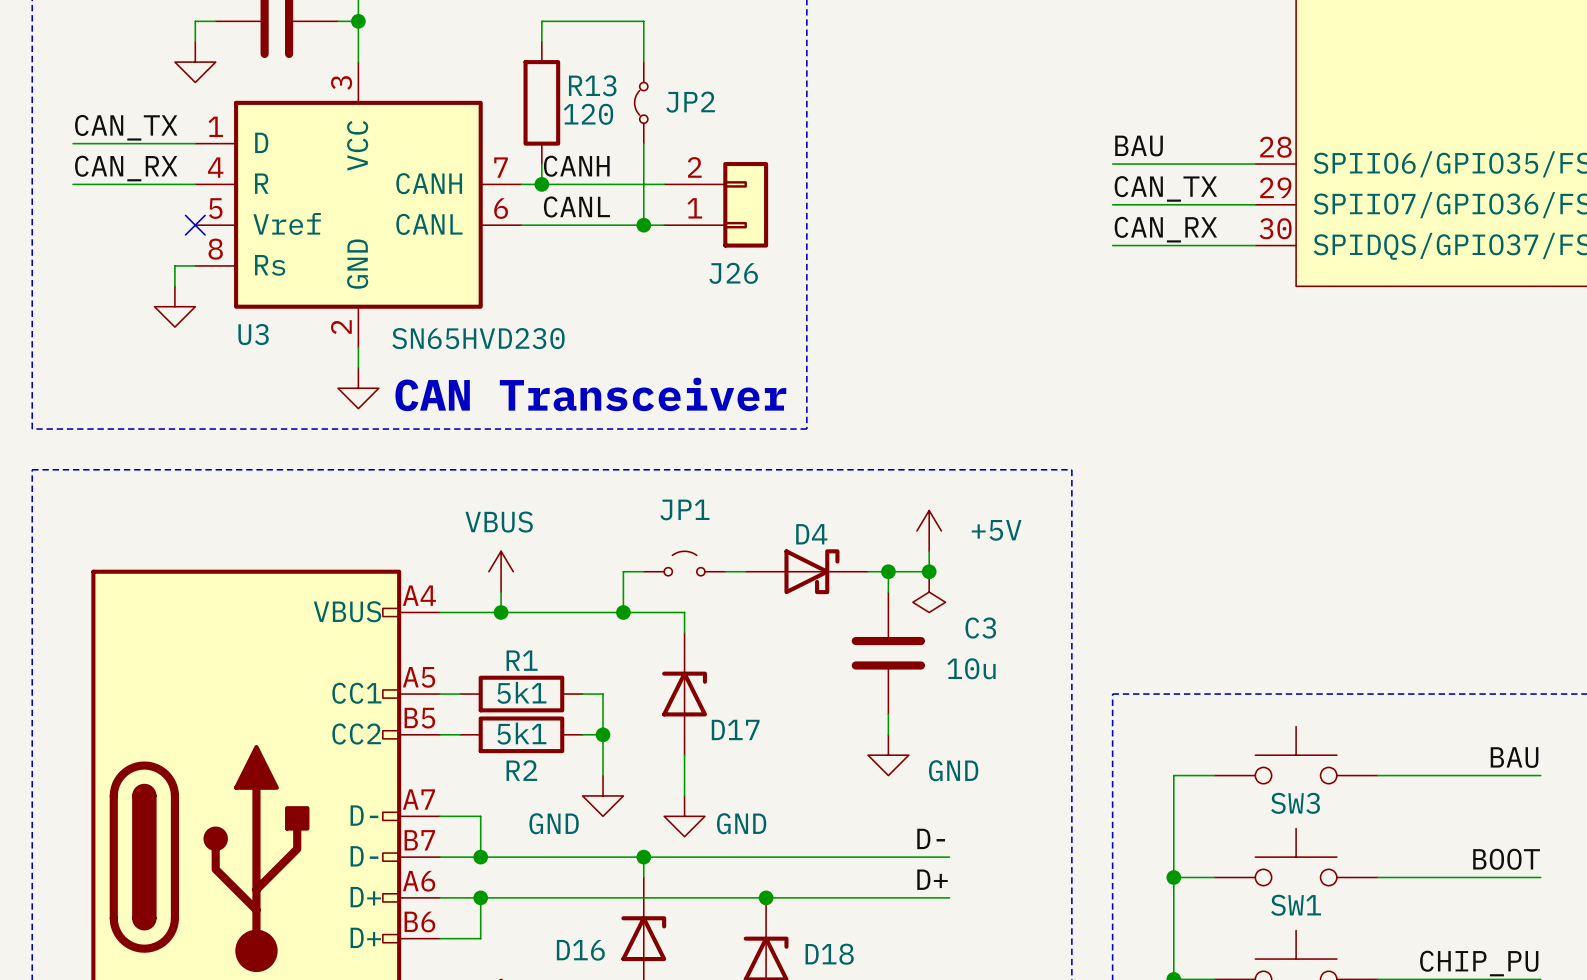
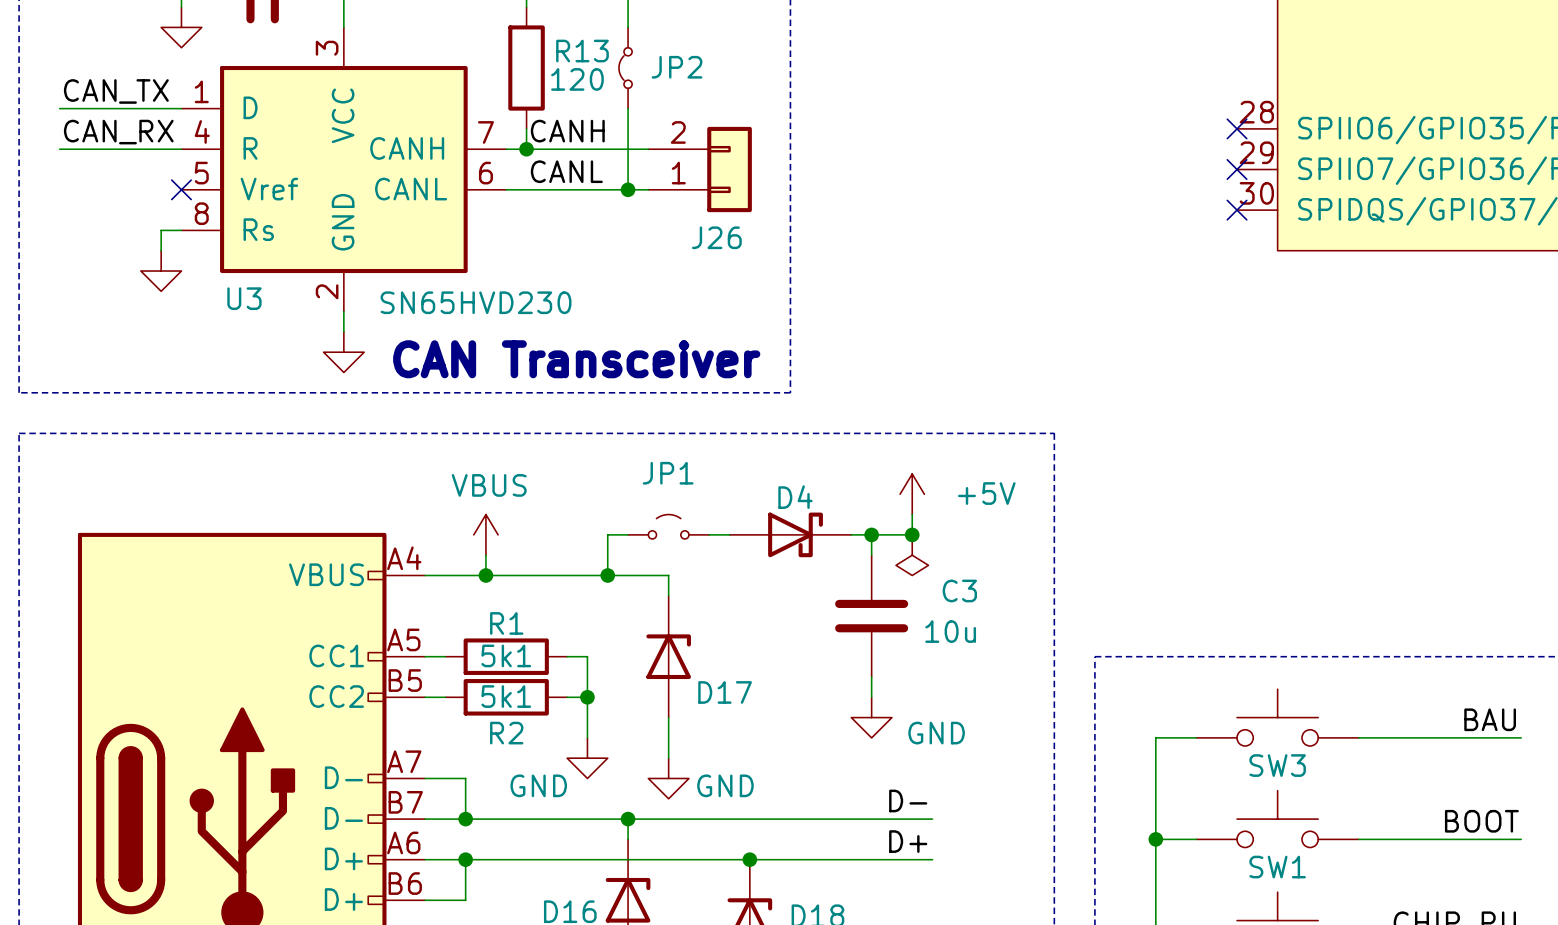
label: BAU (1139, 146) -> none
wire: (1112, 164) (1255, 164) -> none
no-connect mark: none -> (1237, 128)
label: CAN_TX (1165, 188) -> none
wire: (1112, 204) (1255, 204) -> none
no-connect mark: none -> (1237, 169)
label: CAN_RX (1165, 229) -> none
wire: (1112, 245) (1255, 245) -> none
no-connect mark: none -> (1237, 210)

